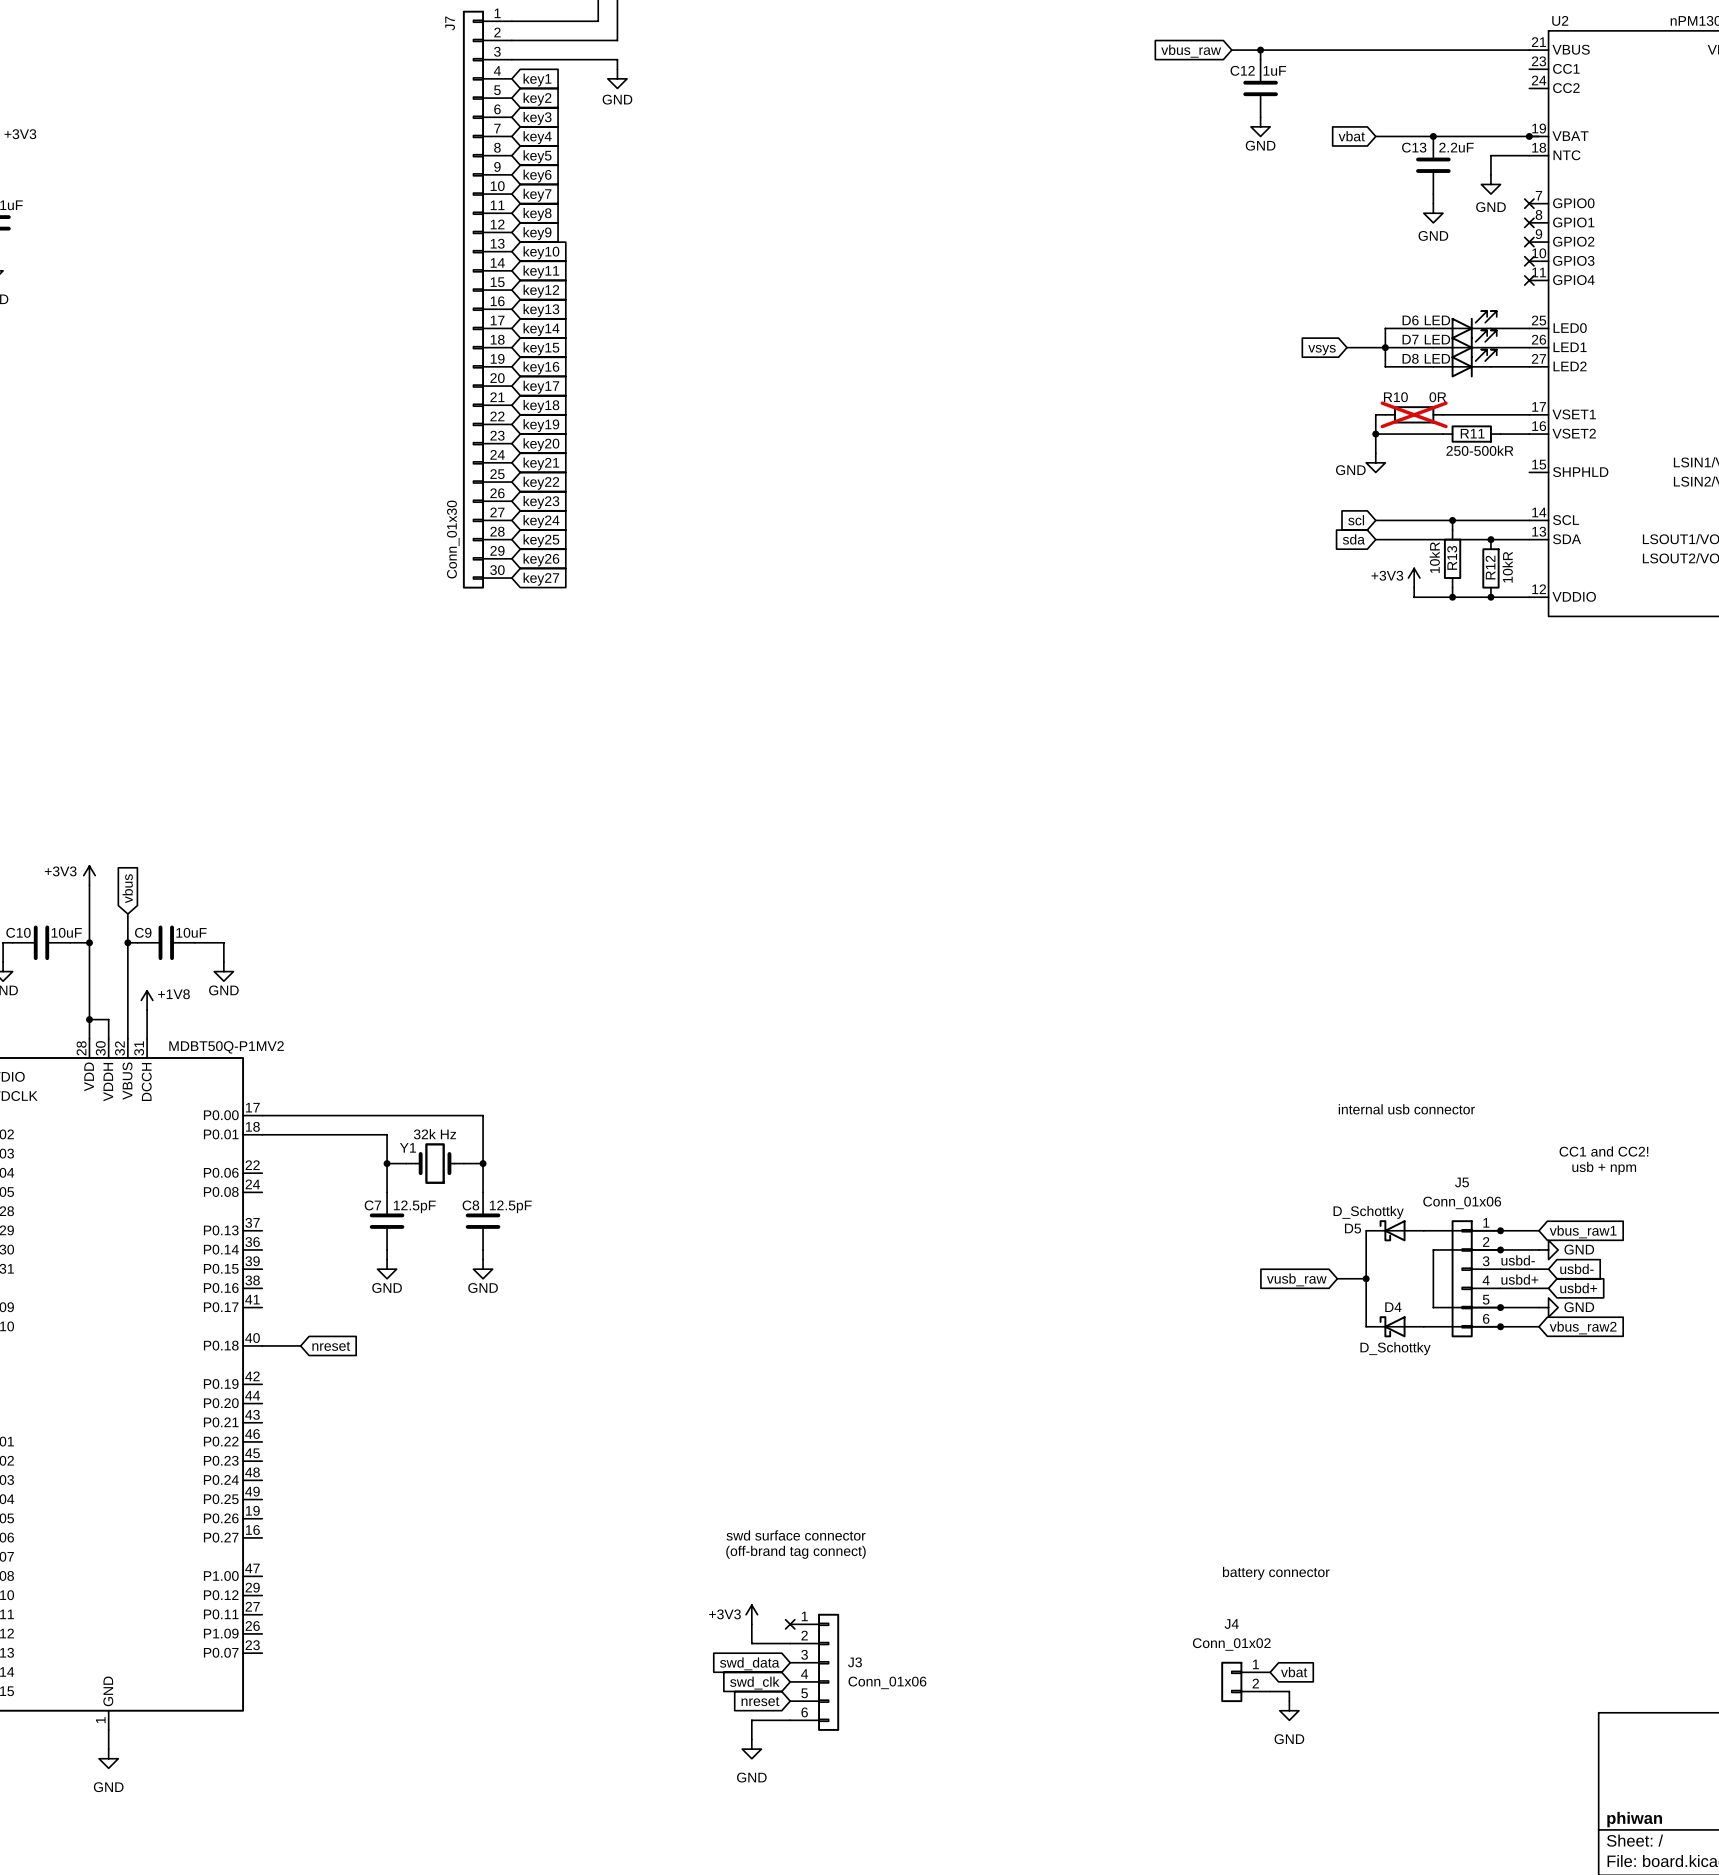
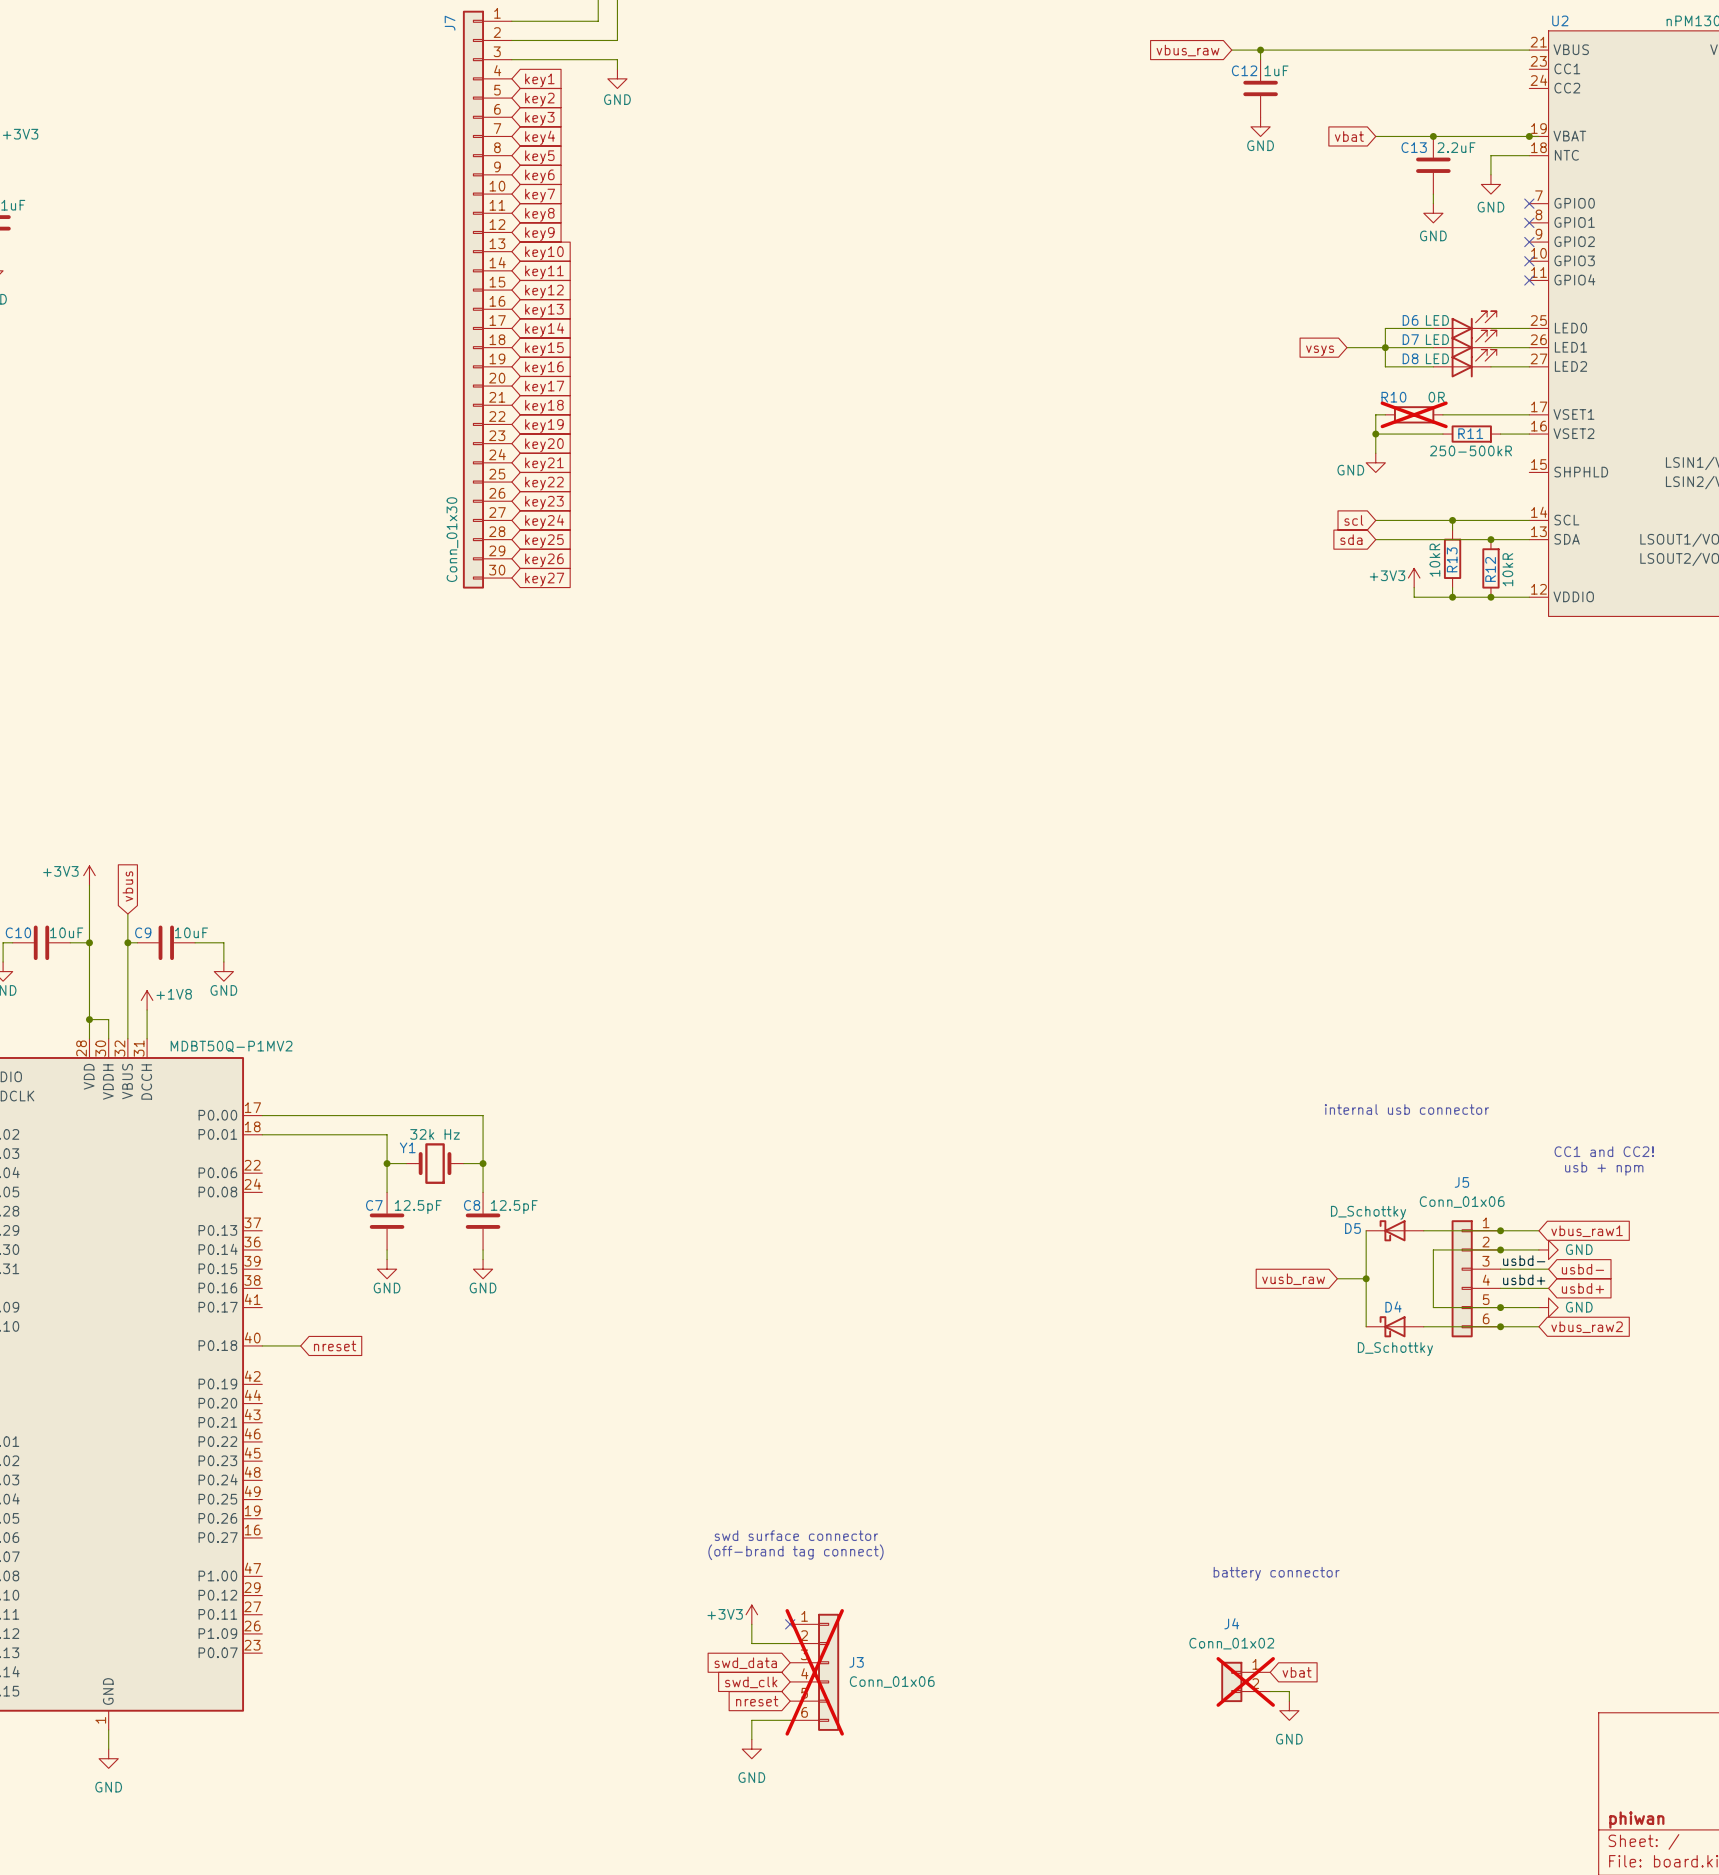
J3 do-not-place cross: none -> (814, 1672)
J4 do-not-place cross: none -> (1245, 1681)

